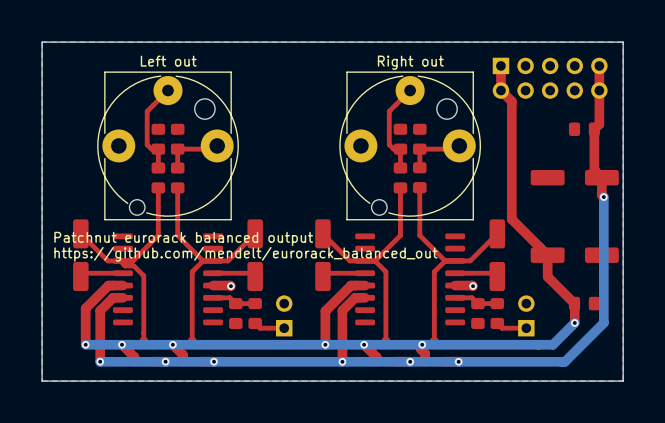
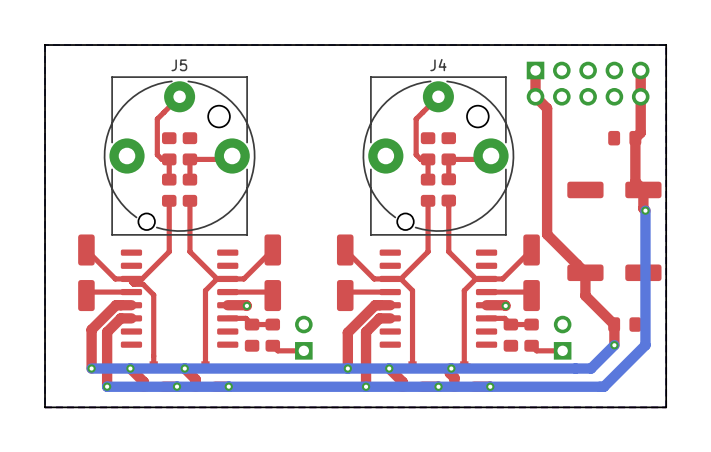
Left out name: Left out (168, 61) -> J5 (179, 65)
Right out name: Right out (410, 62) -> J4 (438, 65)
text: Patchnut eurorack balanced output (183, 238) -> none
text: https://github.com/mendelt/eurorack_balanced_out (245, 254) -> none

